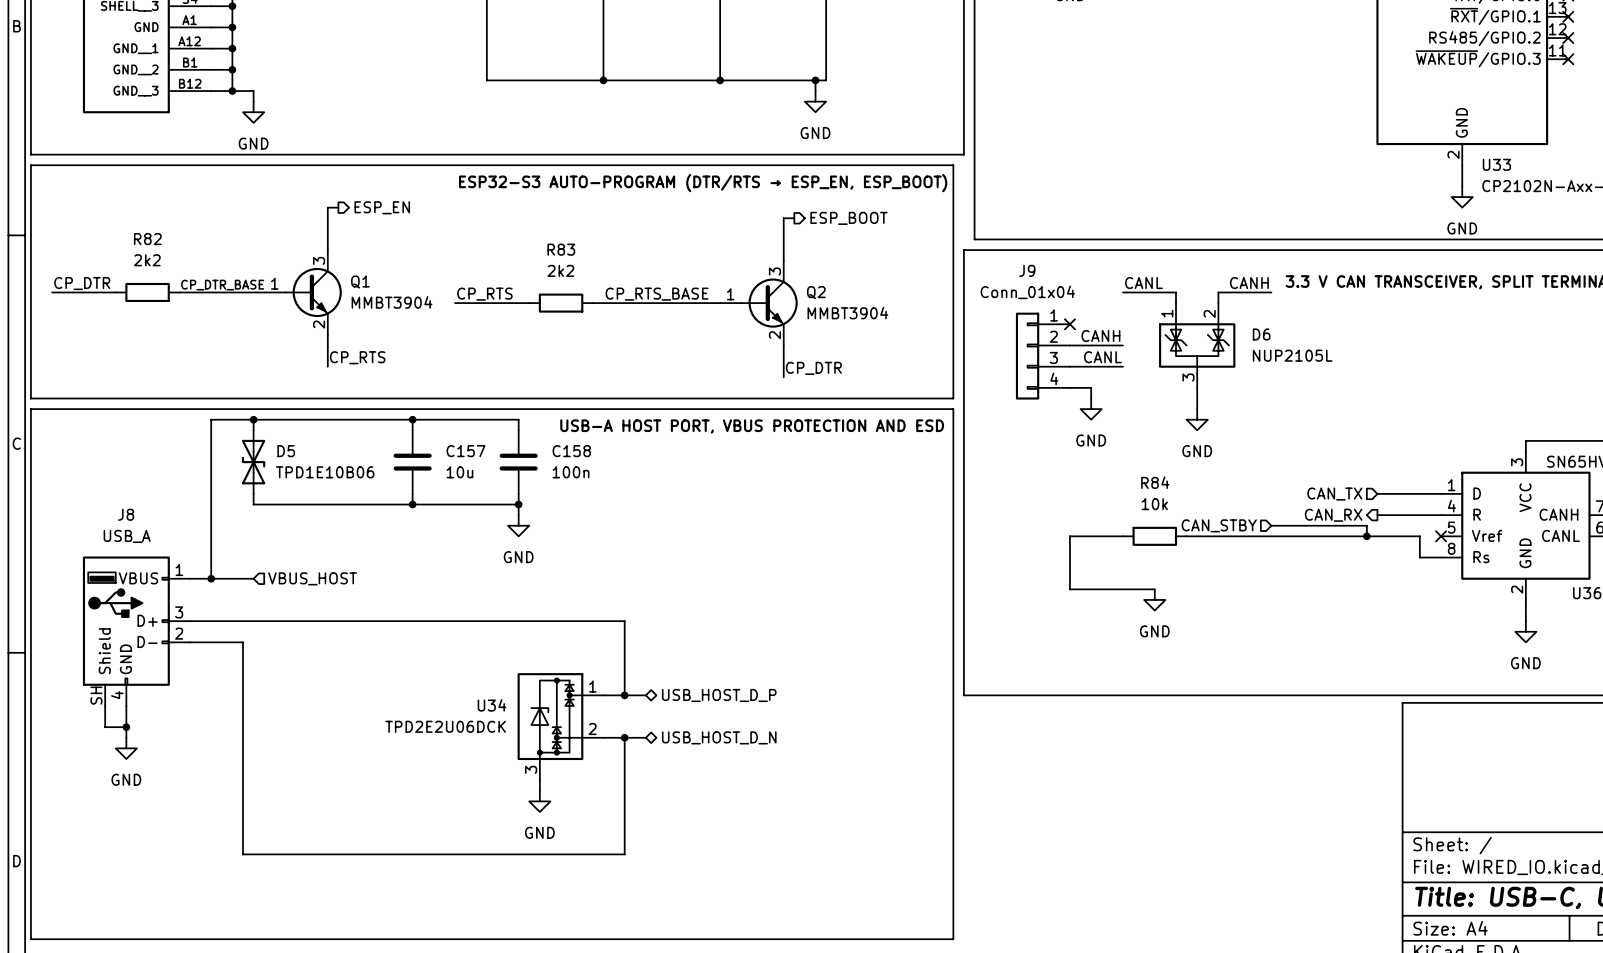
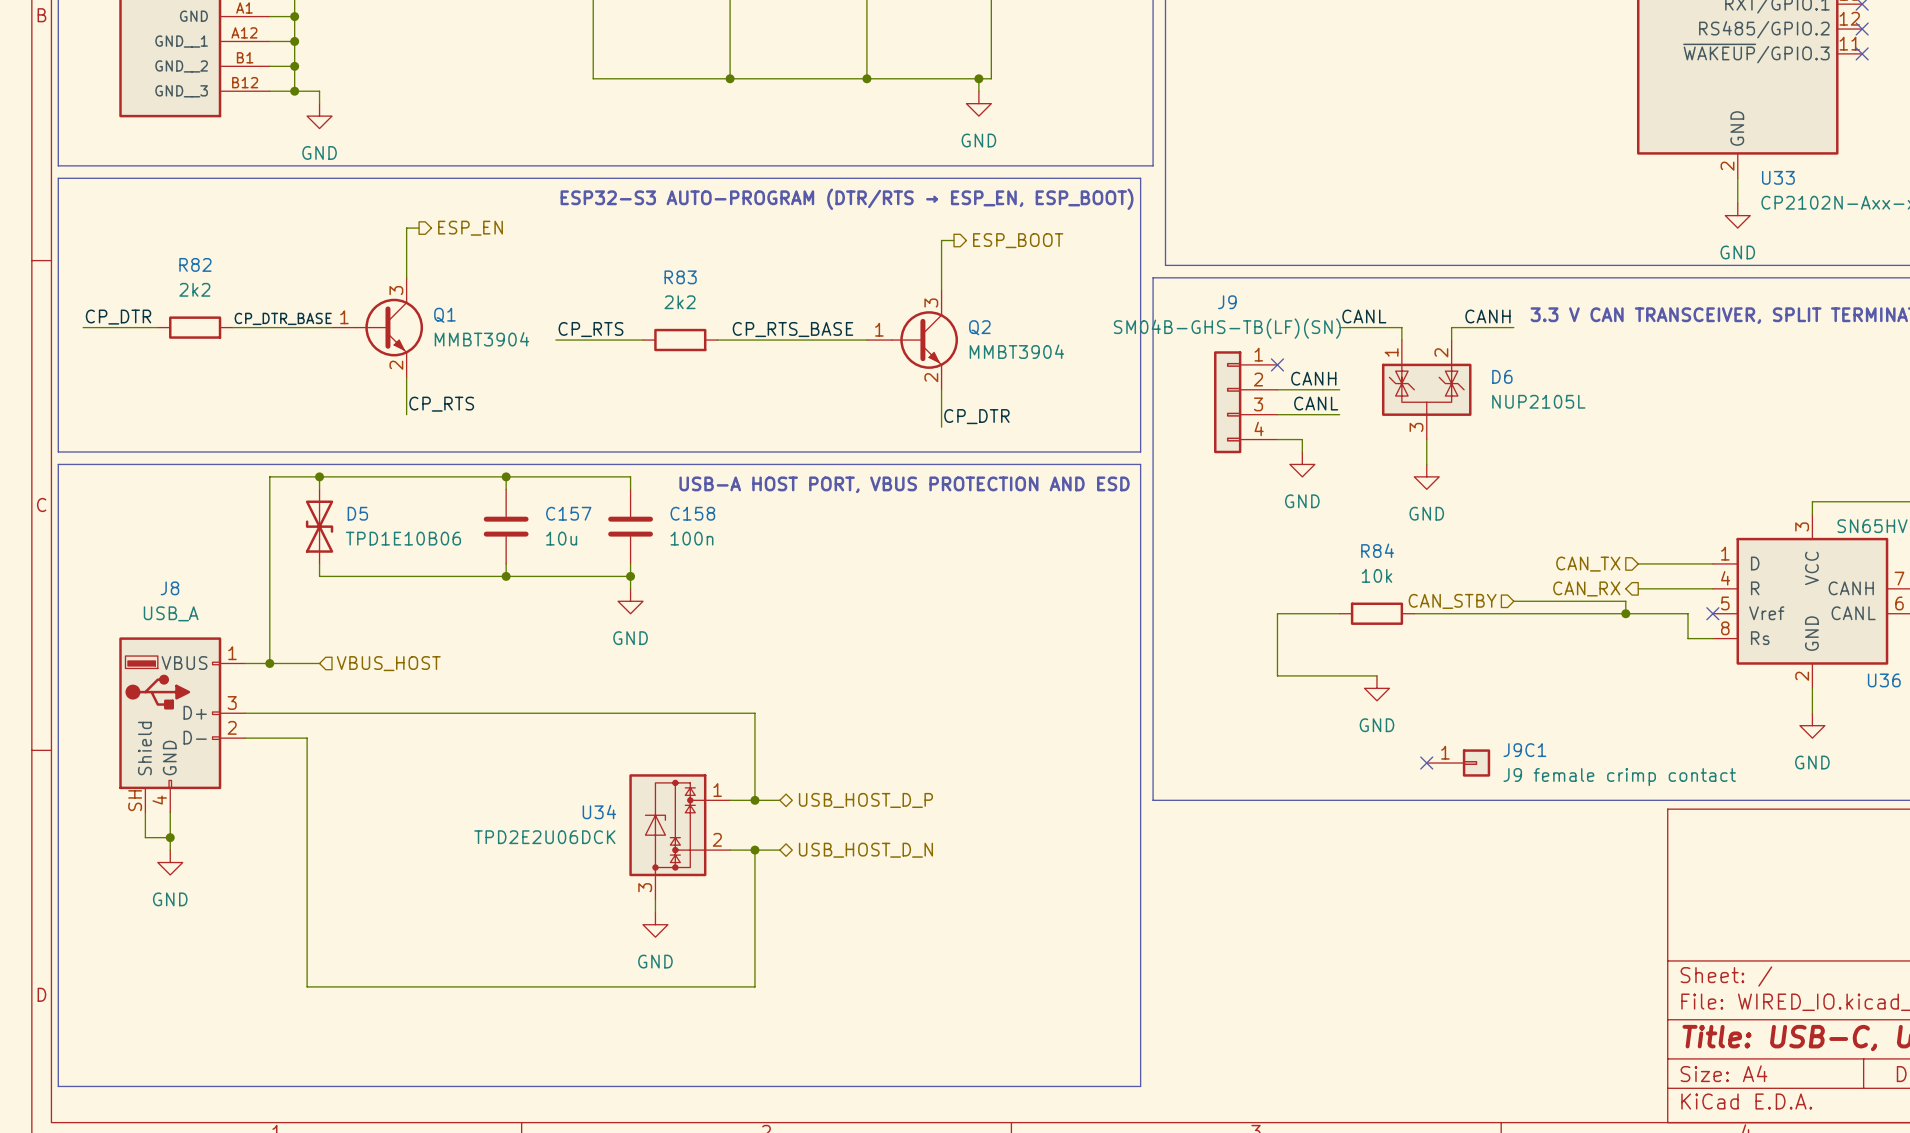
J9 value: Conn_01x04 (1027, 292) -> SM04B-GHS-TB(LF)(SN) (1227, 328)
no-connect mark: none -> (1426, 763)
J9C1: none -> J9 female crimp contact (1458, 763)

